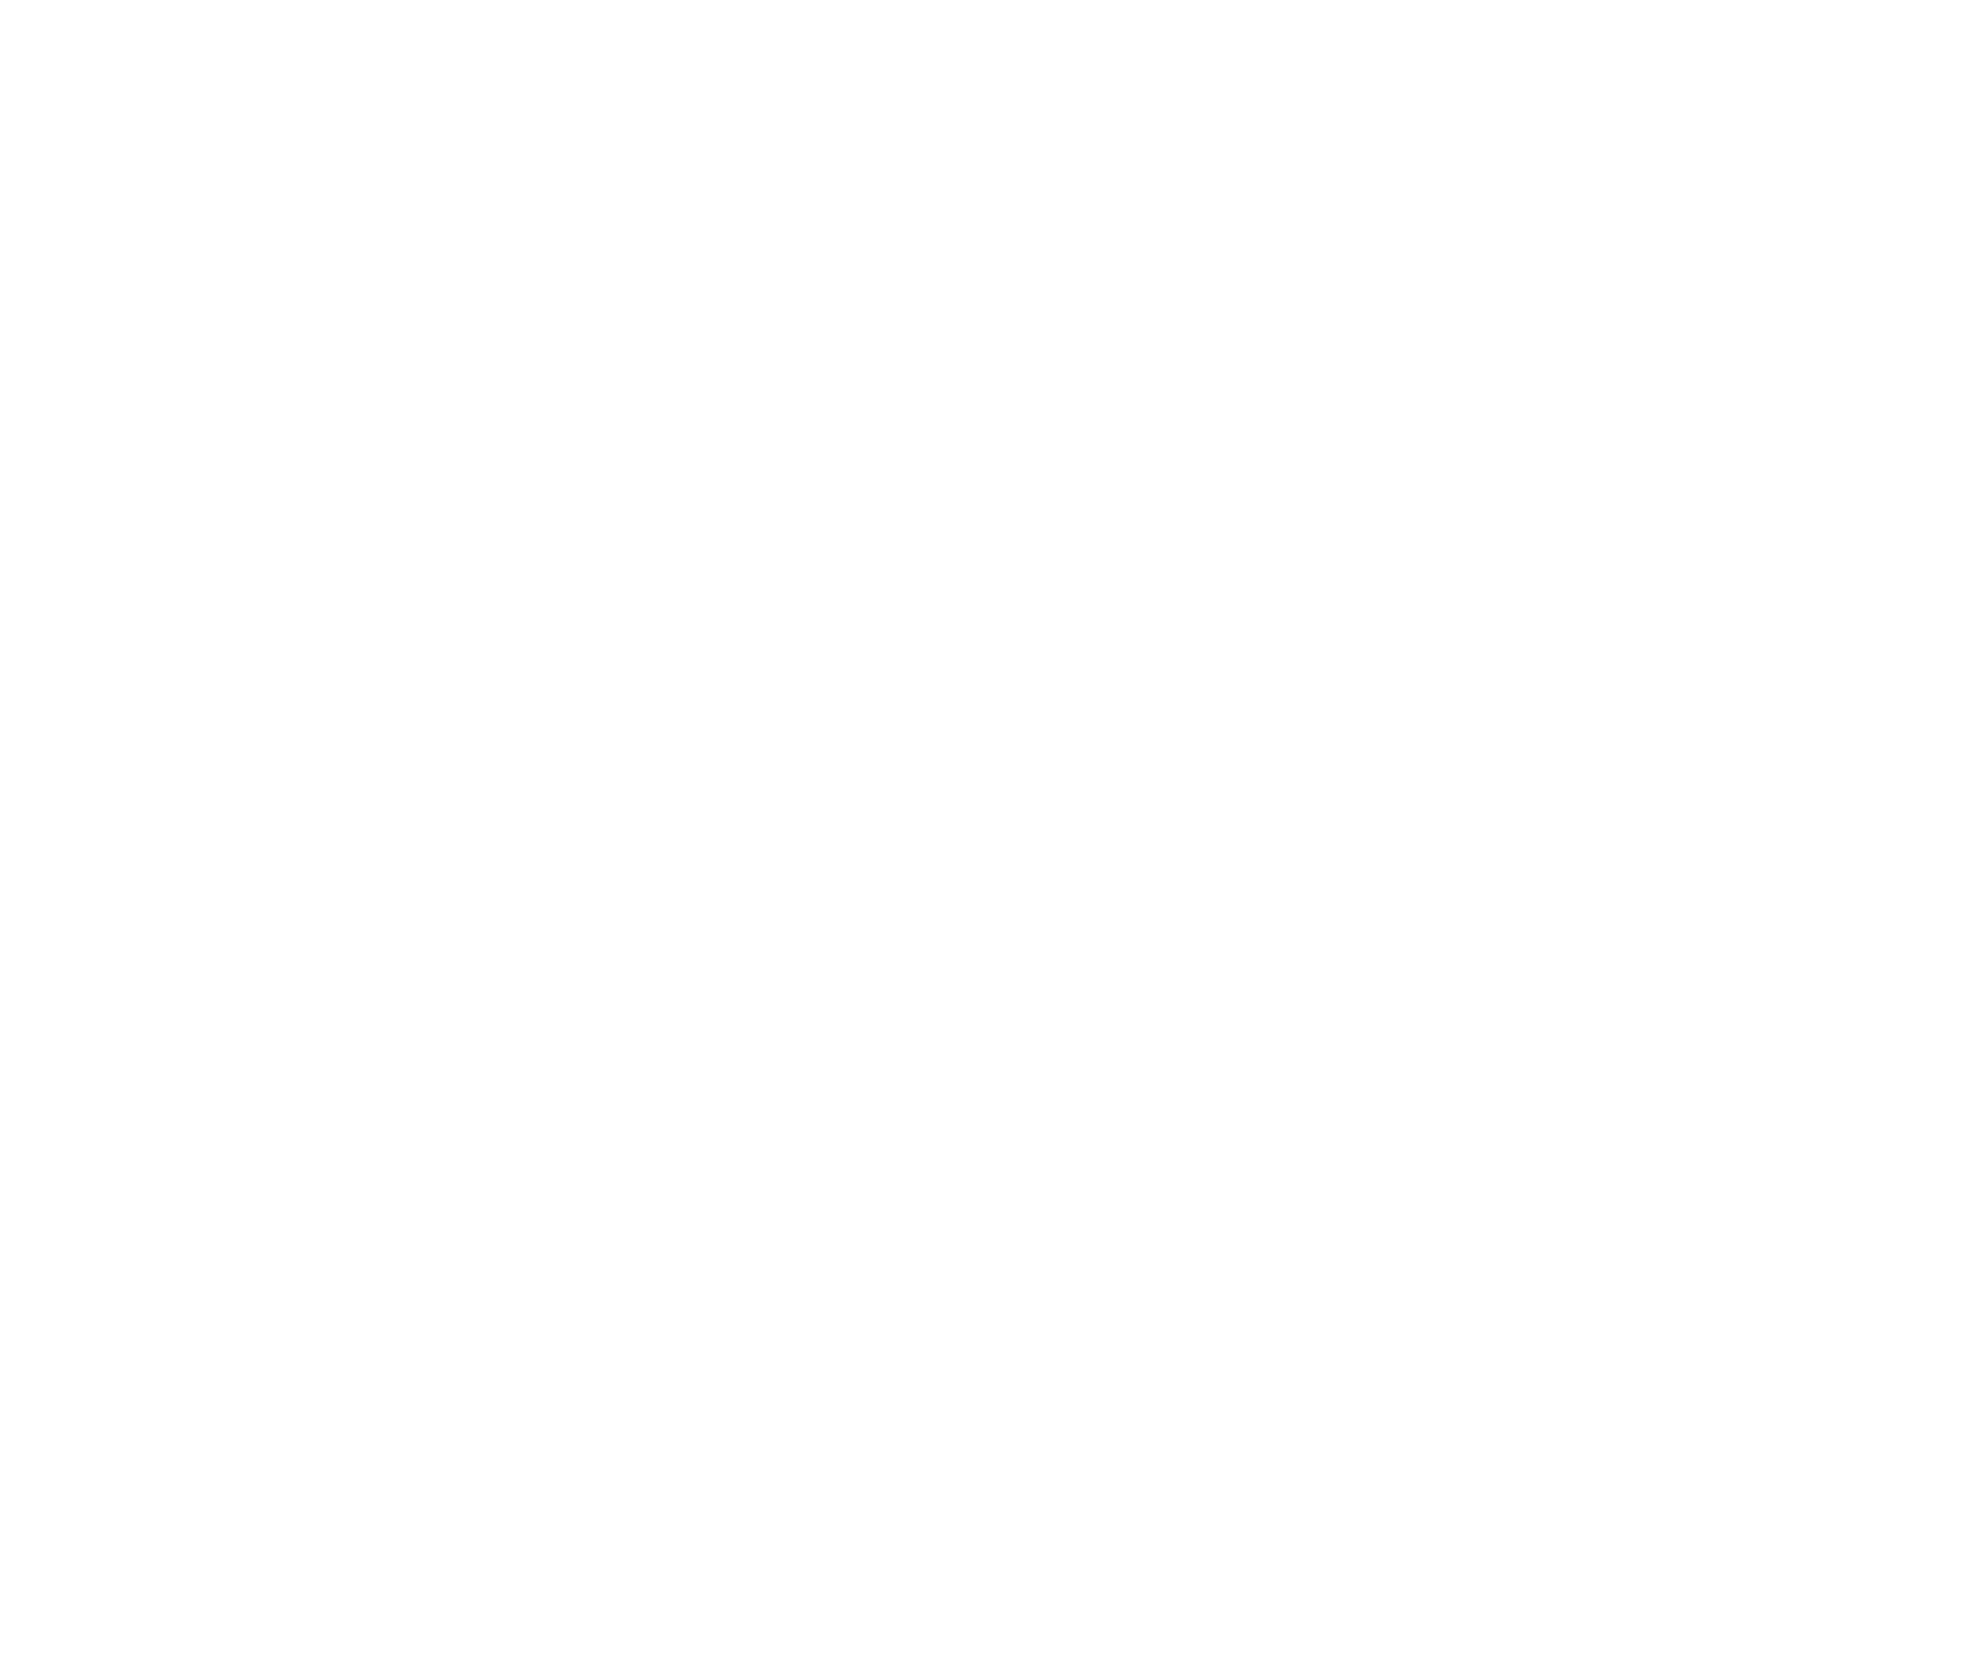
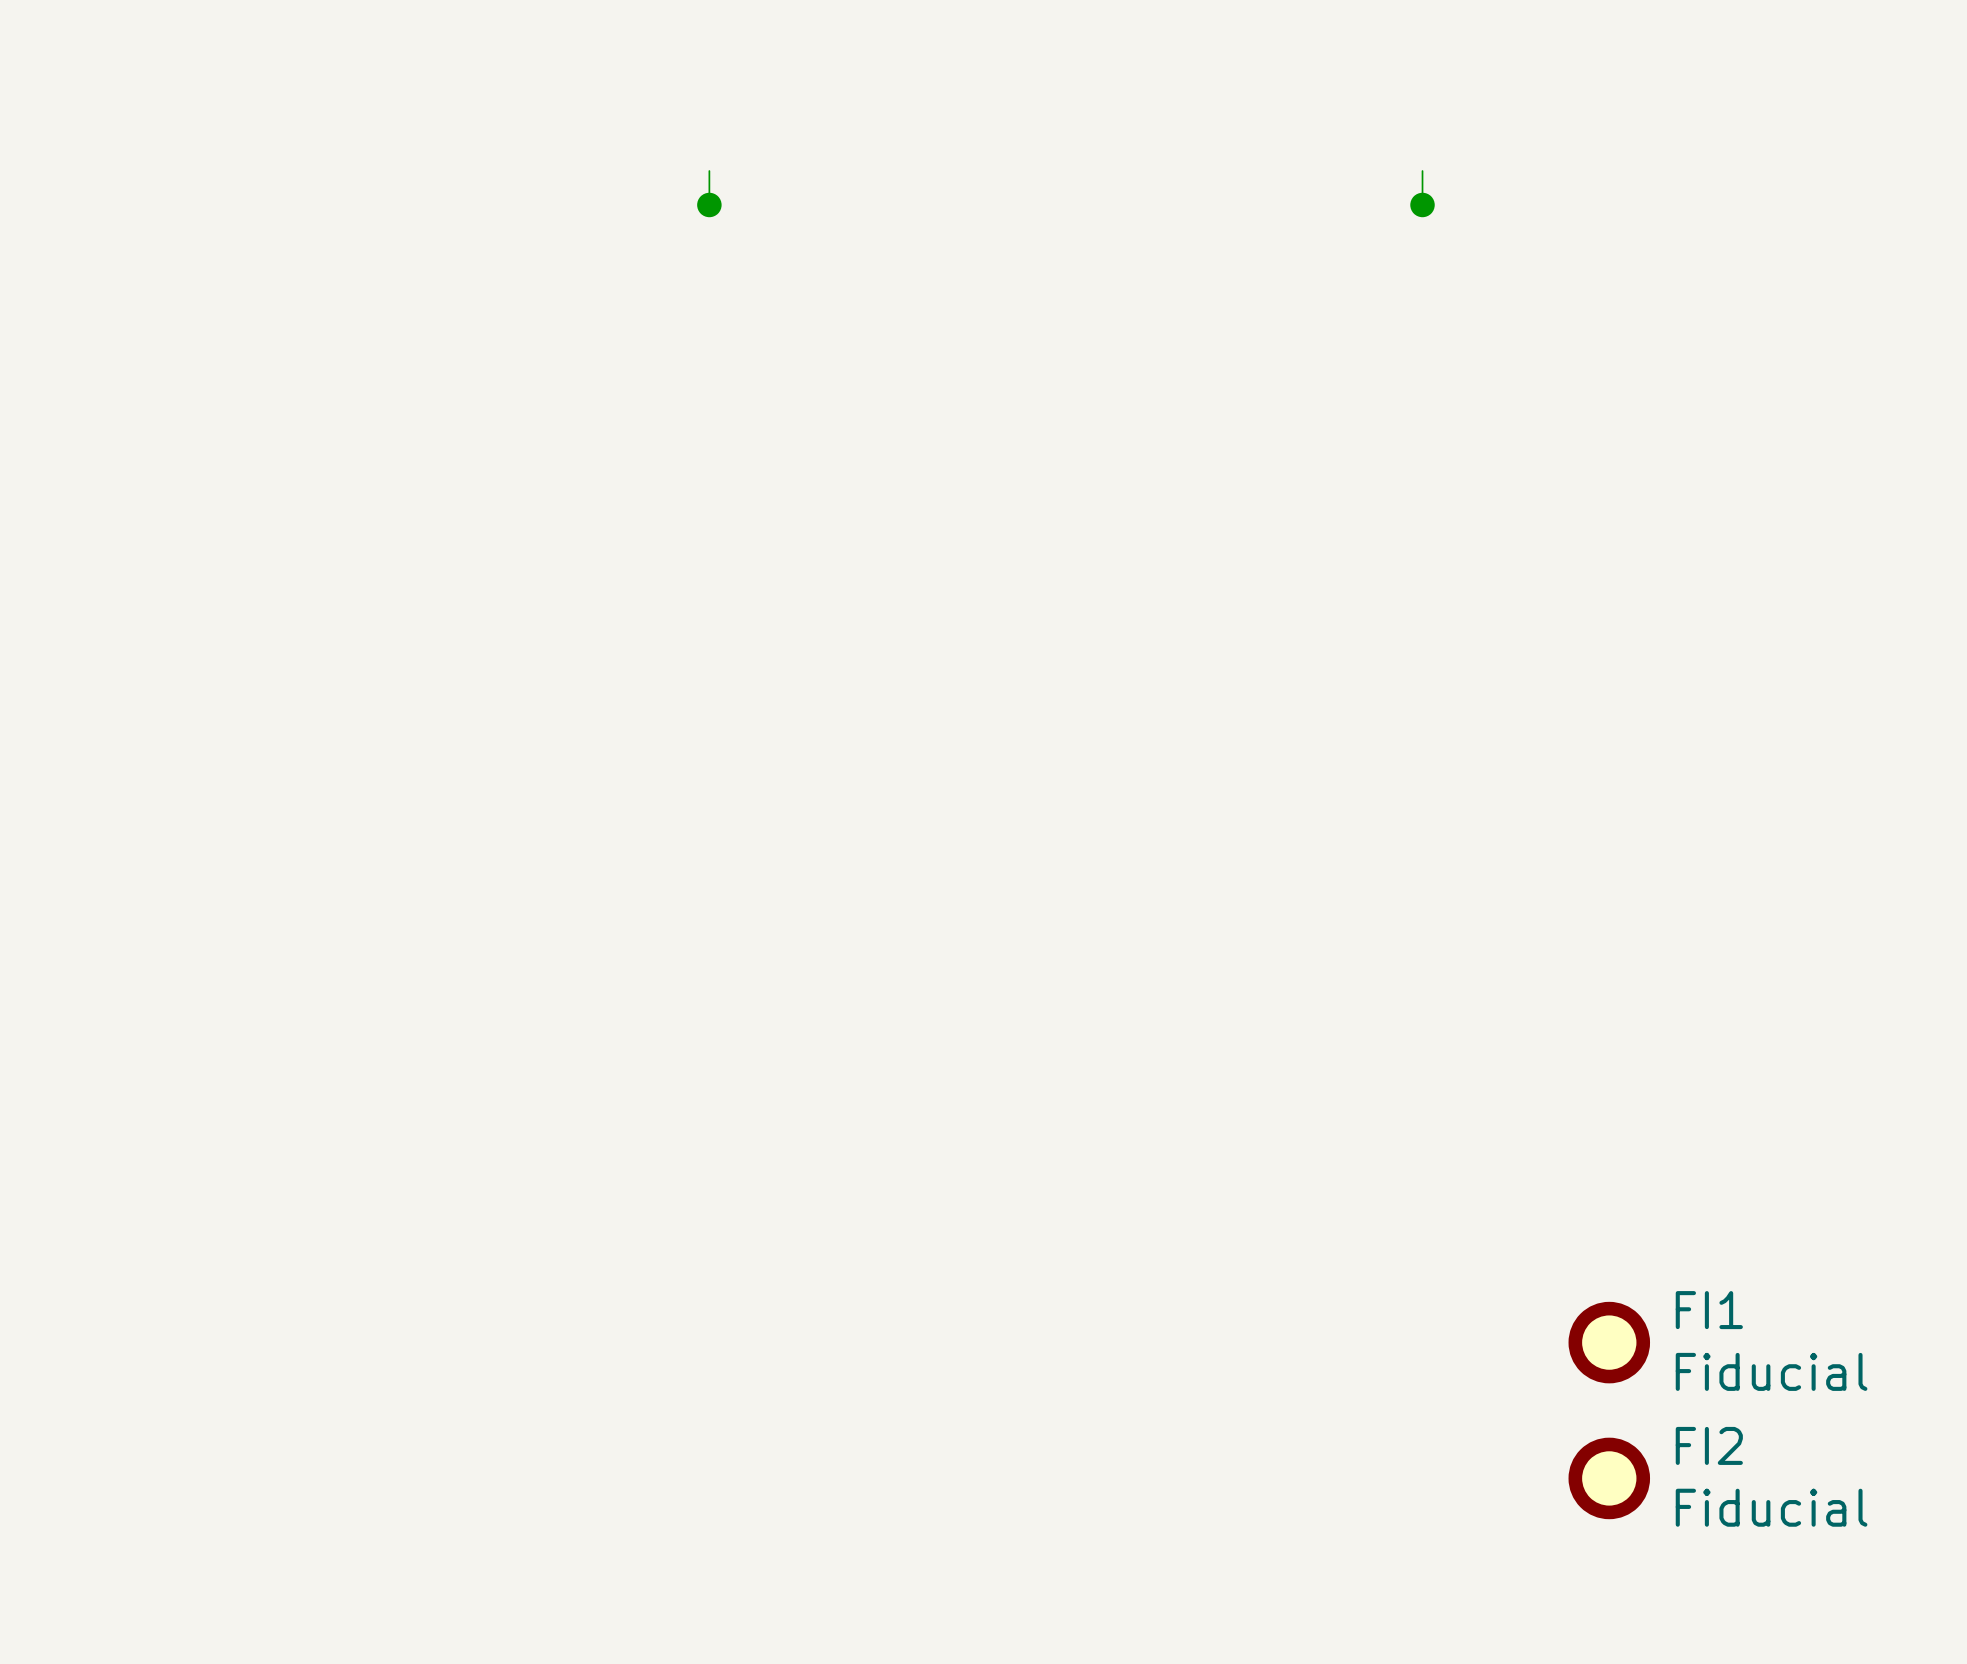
wire: none -> (709, 171) (709, 204)
wire: none -> (1422, 171) (1422, 204)
junction: none -> (709, 204)
junction: none -> (1422, 204)
FI1: none -> Fiducial (1609, 1342)
FI2: none -> Fiducial (1609, 1478)

